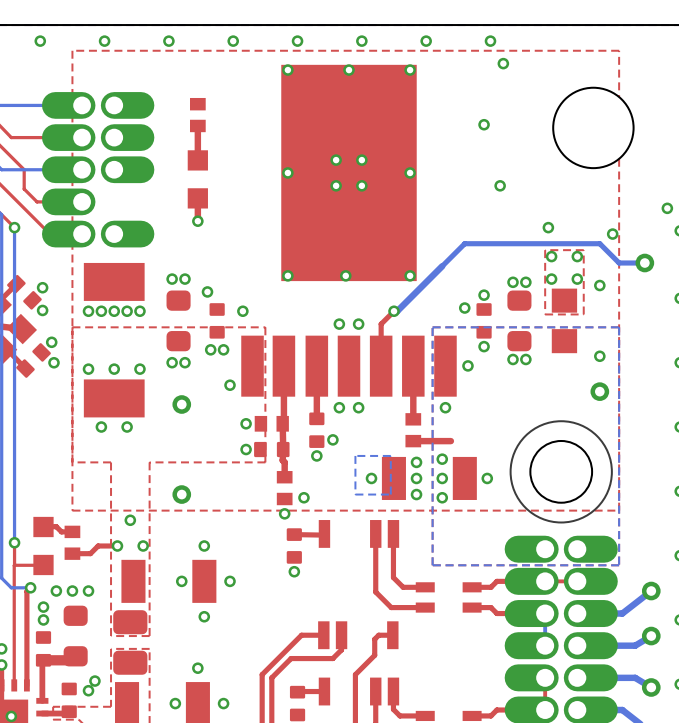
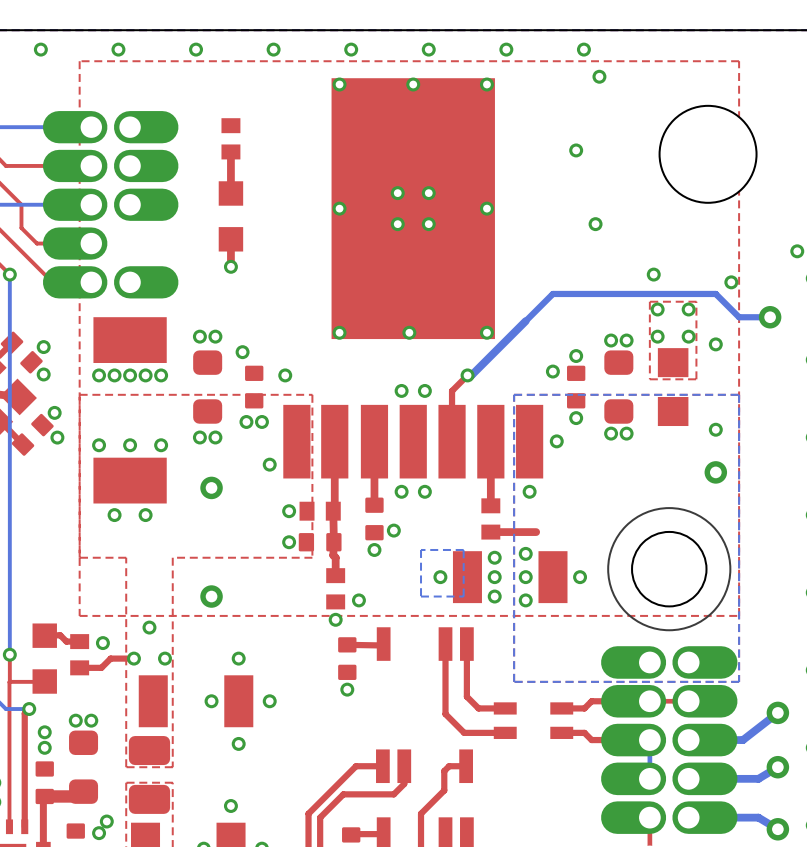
via: none -> (102, 643)
via: (56, 591) -> none
via: (72, 591) -> none
via: (88, 591) -> none
via: none -> (75, 720)
via: none -> (91, 720)

